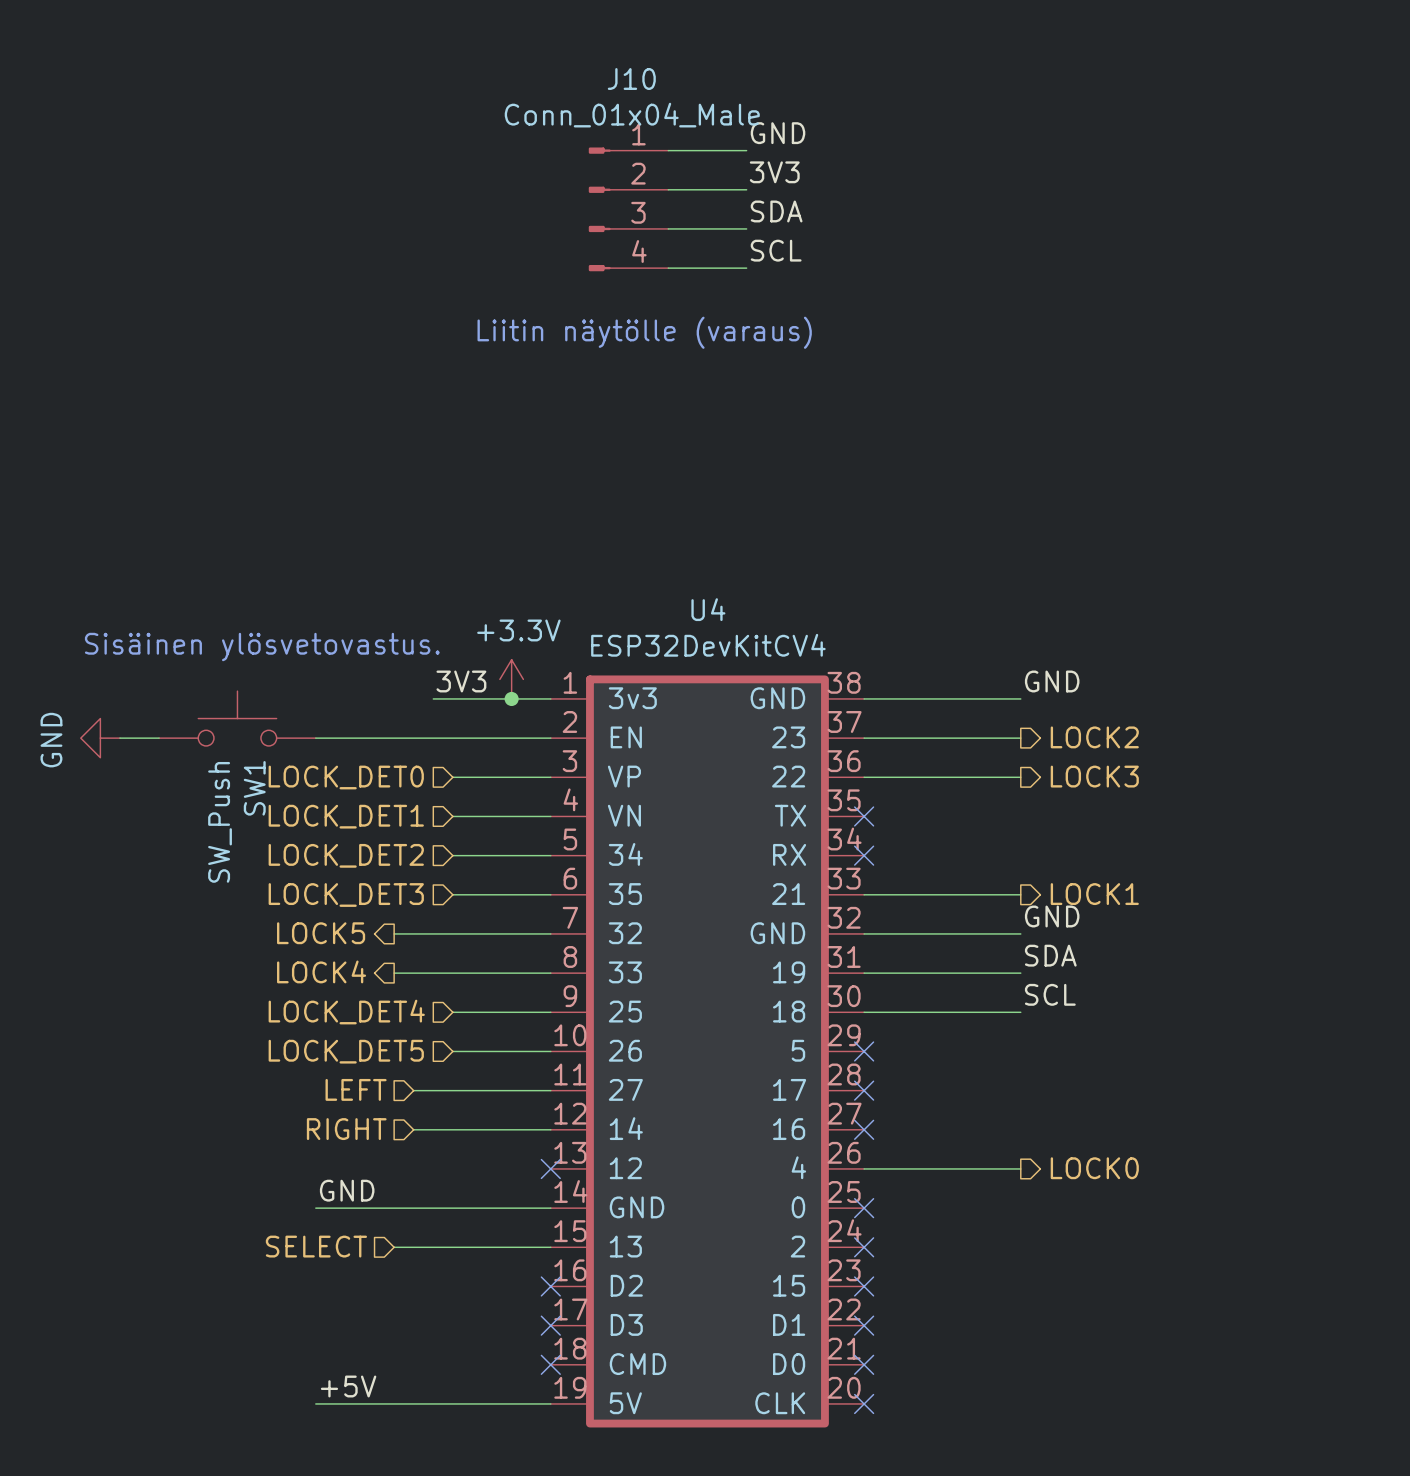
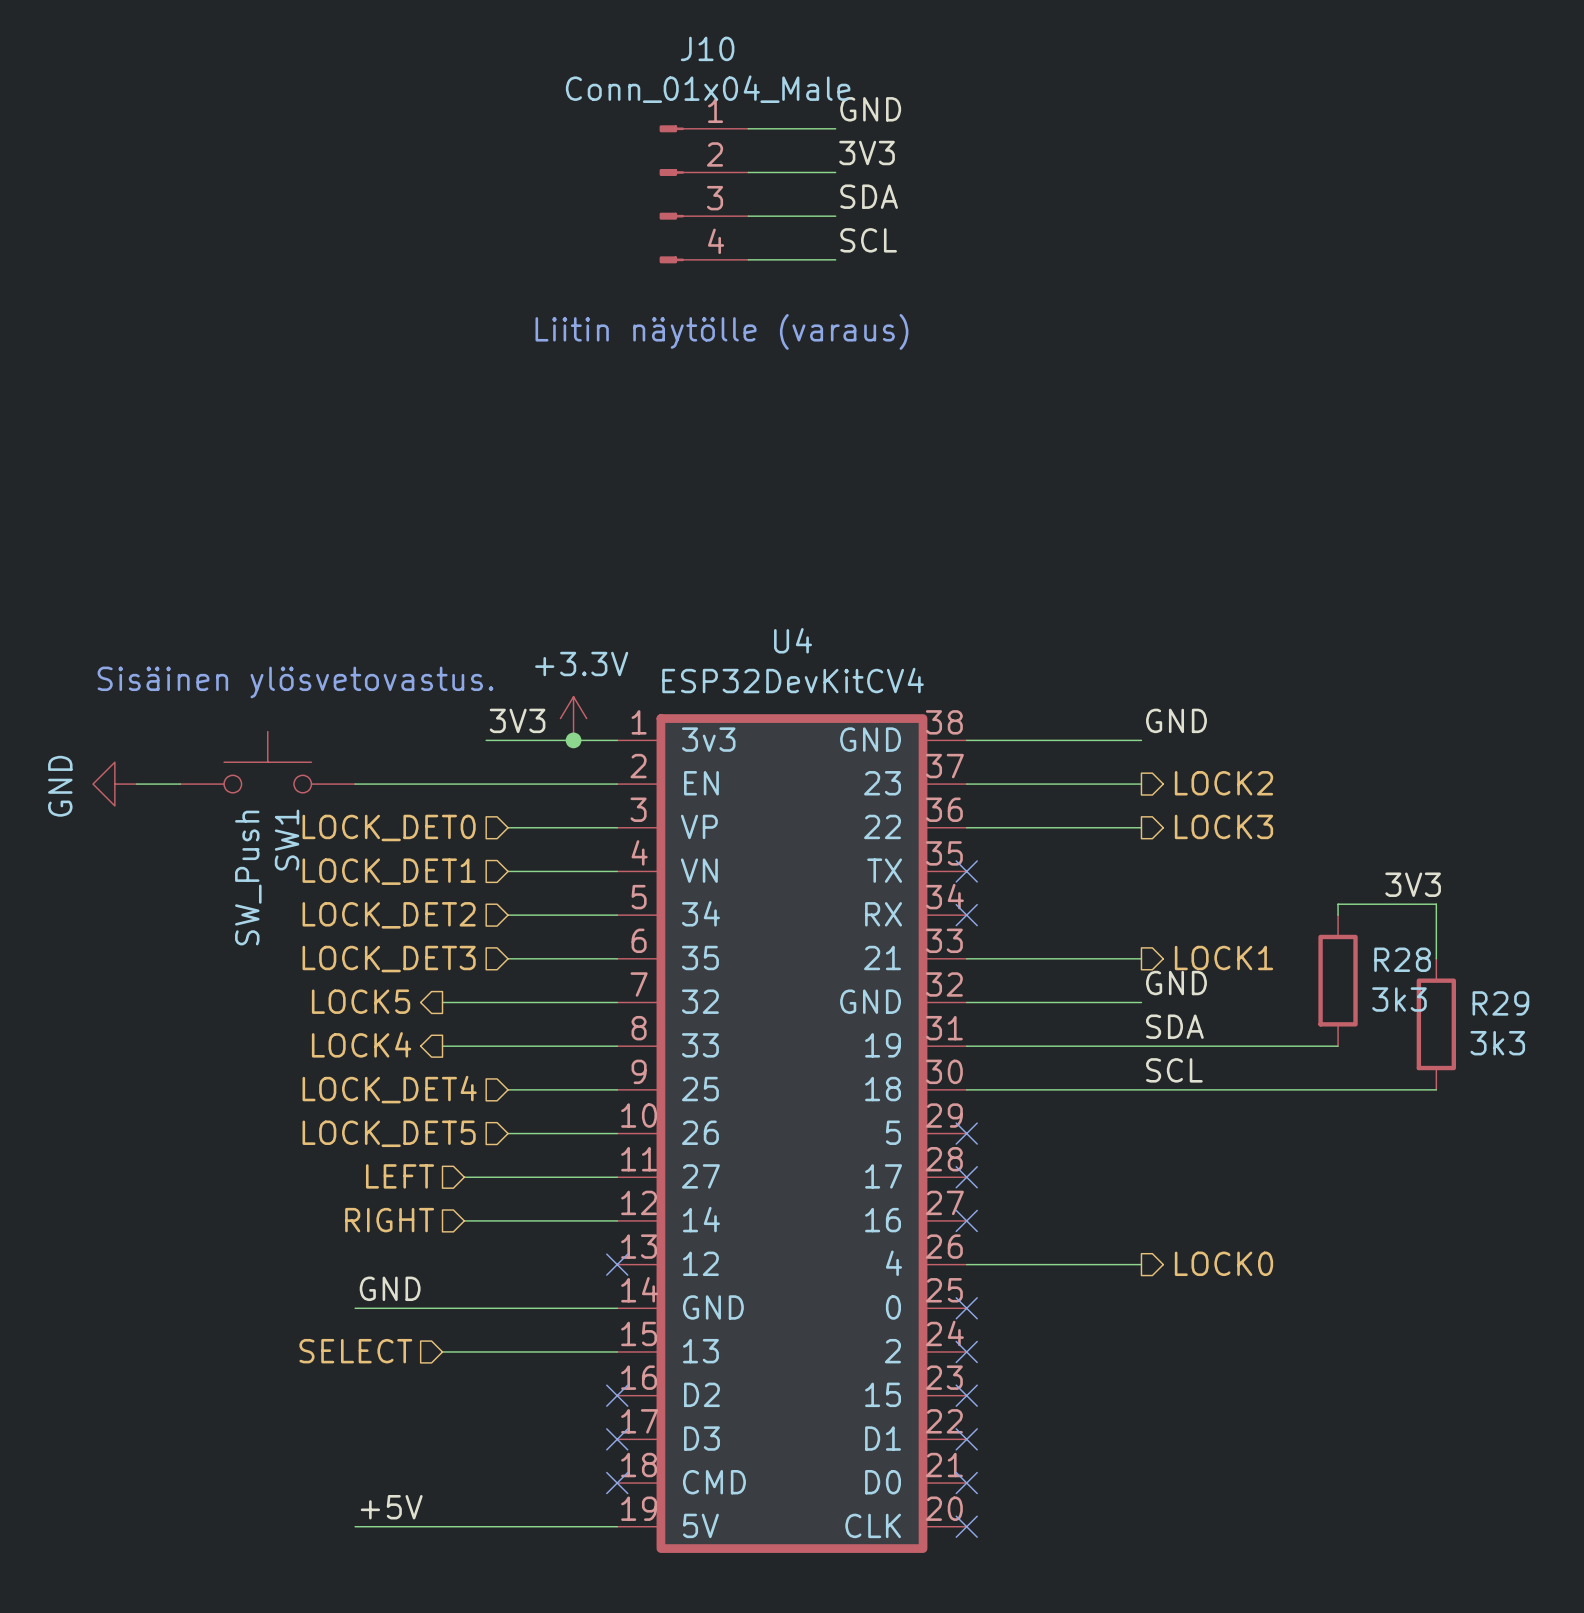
label: none -> 3V3 (1413, 884)
wire: none -> (1338, 915) (1338, 904) (1436, 904) (1436, 958)
R28: none -> 3k3 (1338, 980)
R29: none -> 3k3 (1436, 1024)
wire: none -> (1141, 1046) (1338, 1046)
wire: none -> (1141, 1089) (1436, 1089)

